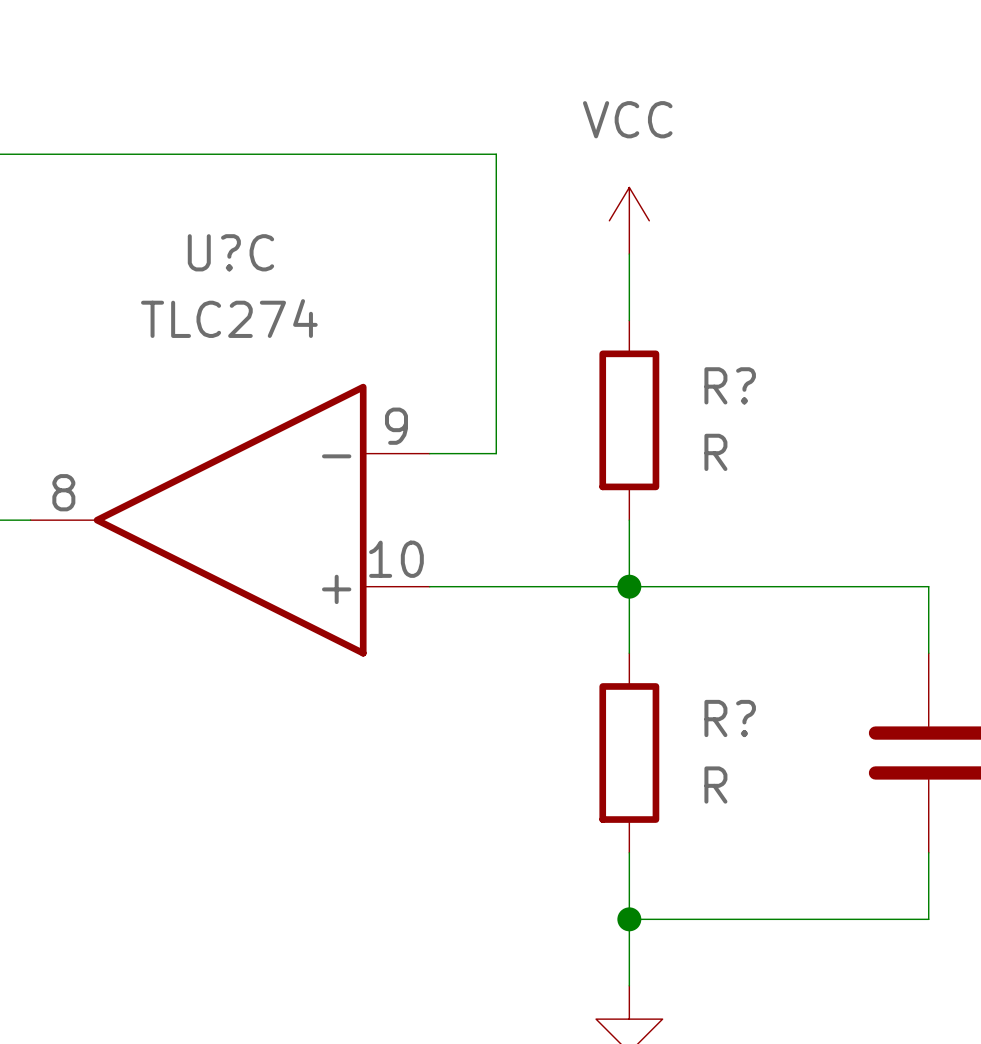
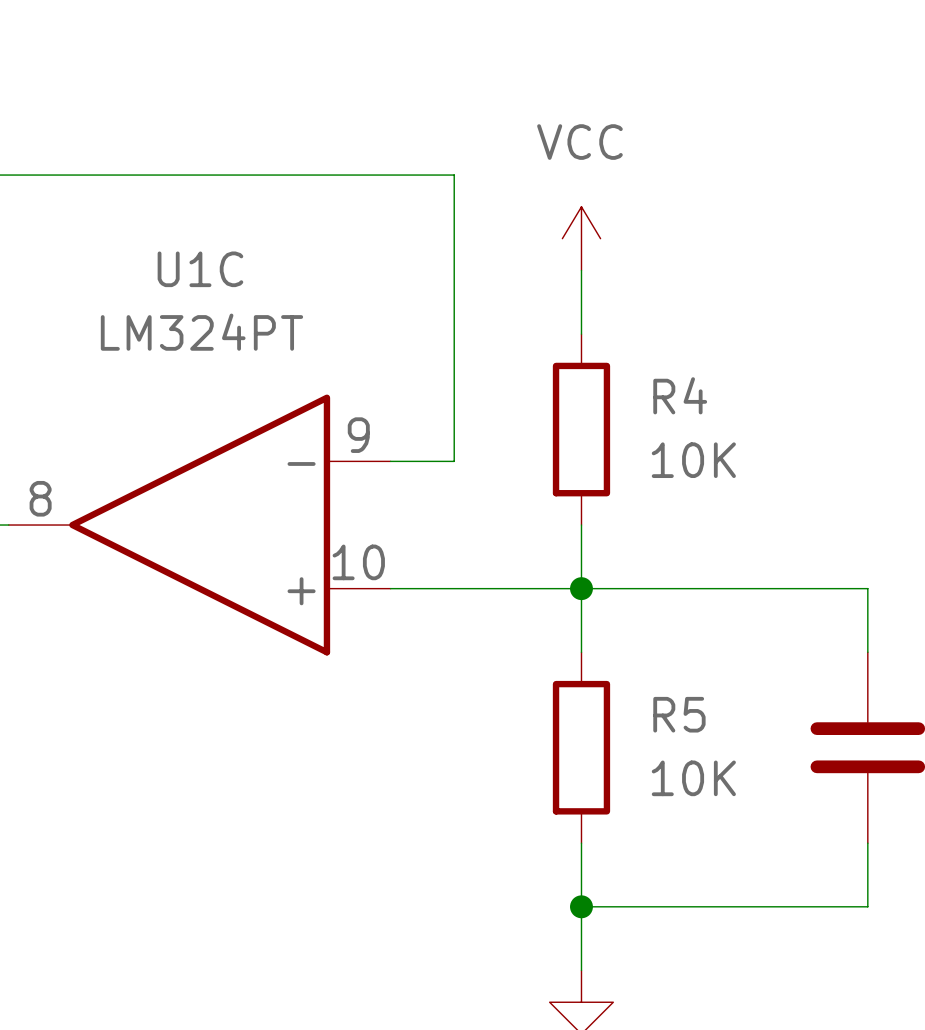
U?C name: U?C (230, 252) -> U1C (200, 269)
U?C value: TLC274 (229, 318) -> LM324PT (201, 332)
R? name: R? (730, 385) -> R4 (680, 395)
R? value: R (715, 452) -> 10K (693, 460)
R? name: R? (730, 718) -> R5 (679, 714)
R? value: R (715, 785) -> 10K (693, 778)

